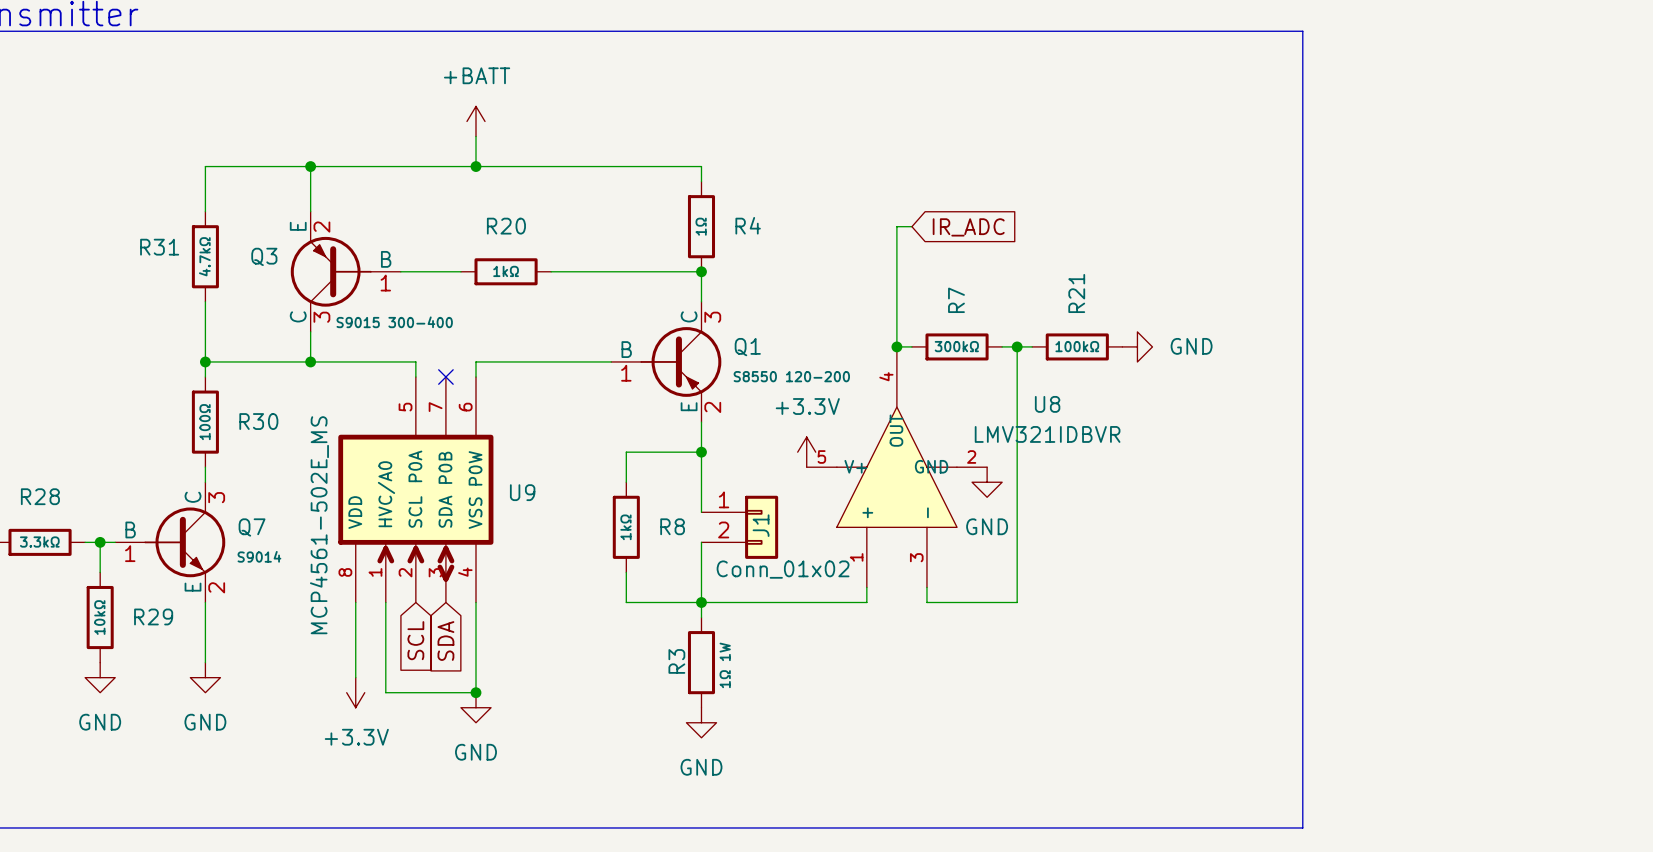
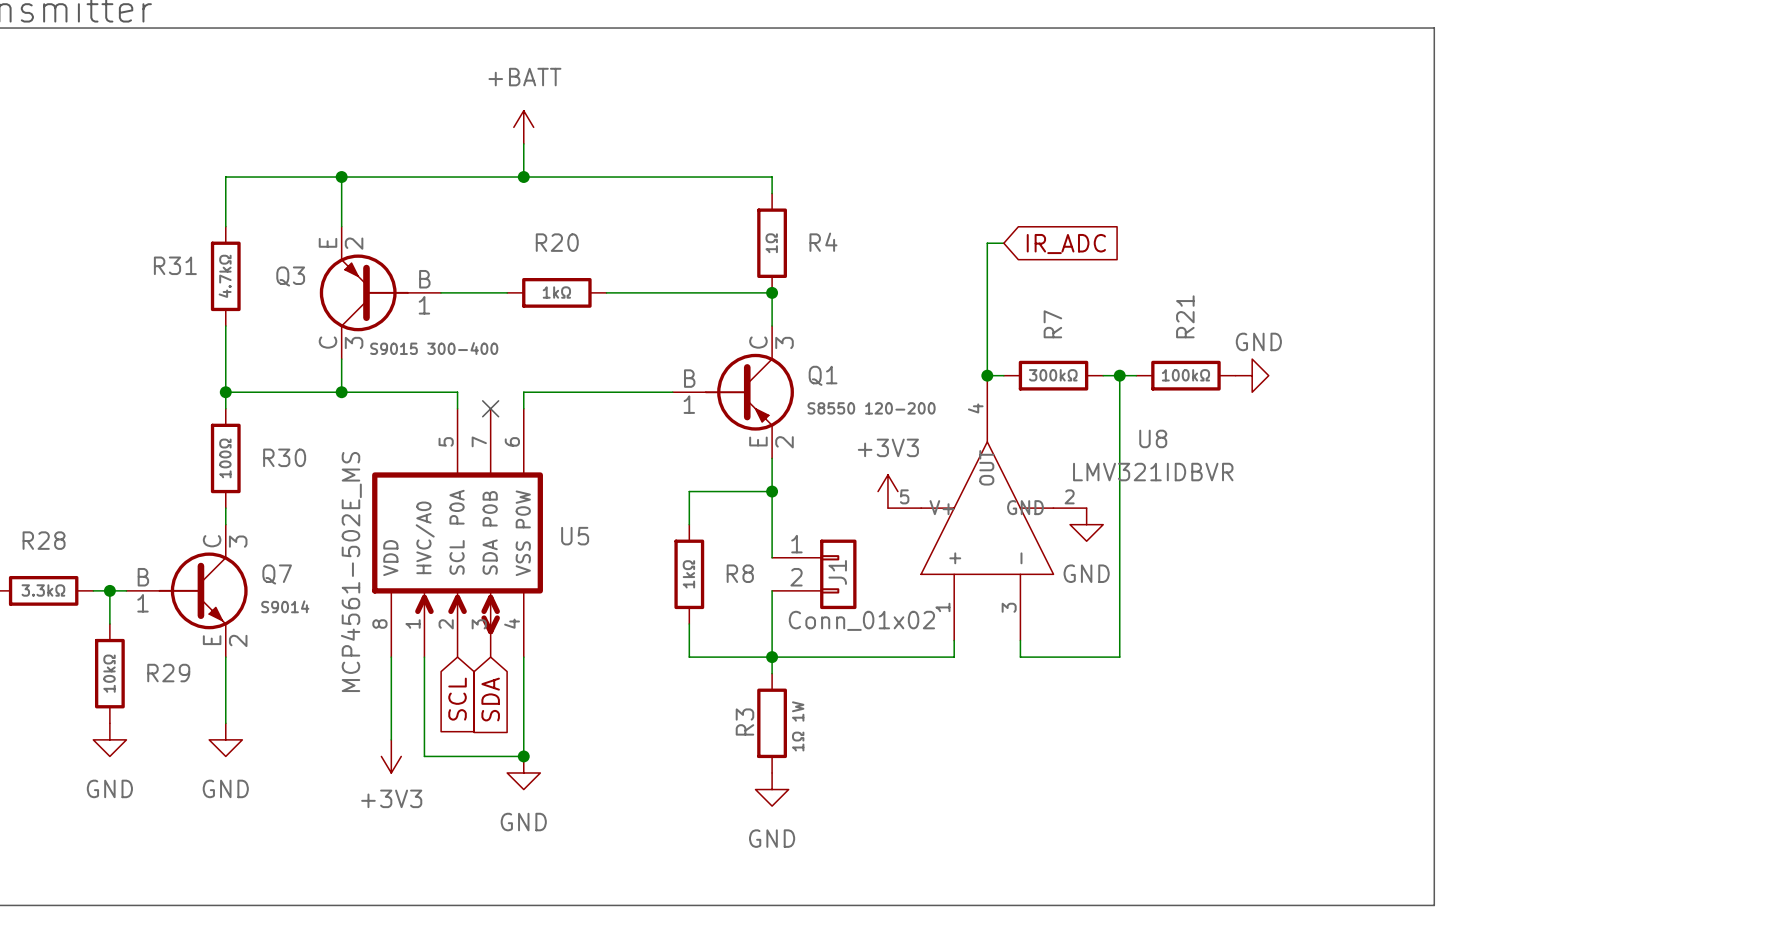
power symbol text position: GND (1191, 346) -> GND (1258, 341)
power symbol: +3.3V (806, 452) -> +3V3 (887, 491)
U9 name: U9 (522, 492) -> U5 (575, 536)
power symbol: +3.3V (355, 692) -> +3V3 (391, 756)

